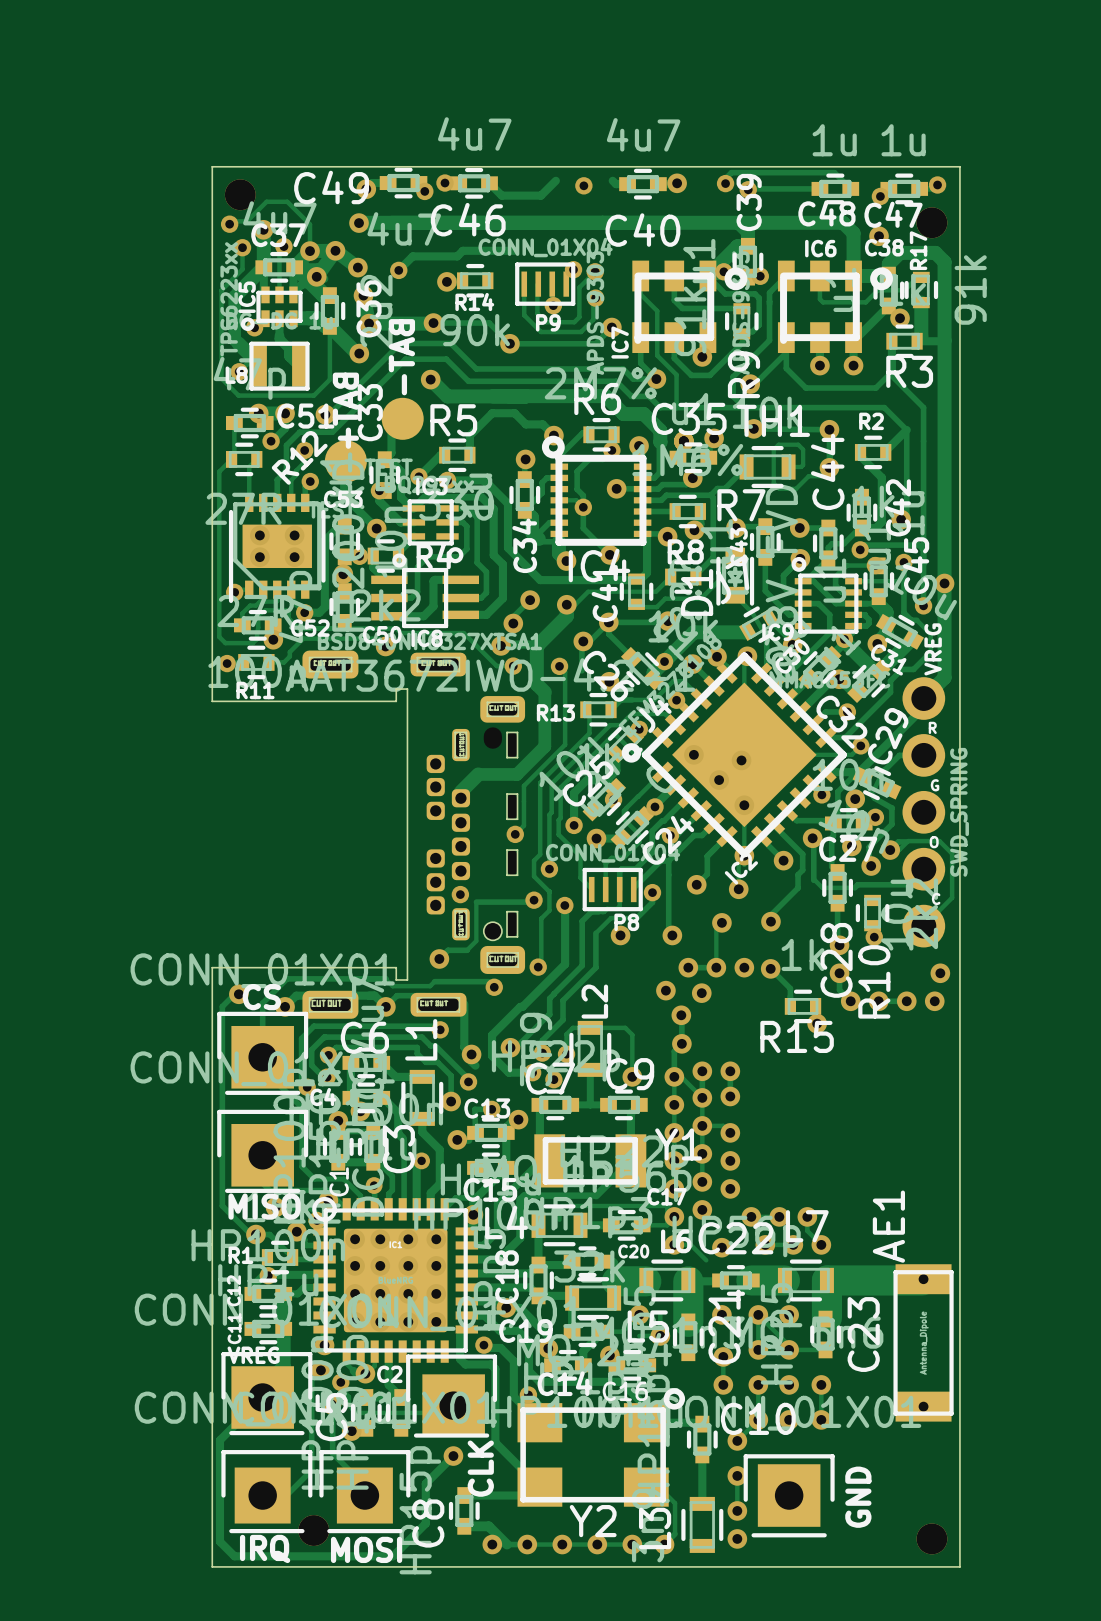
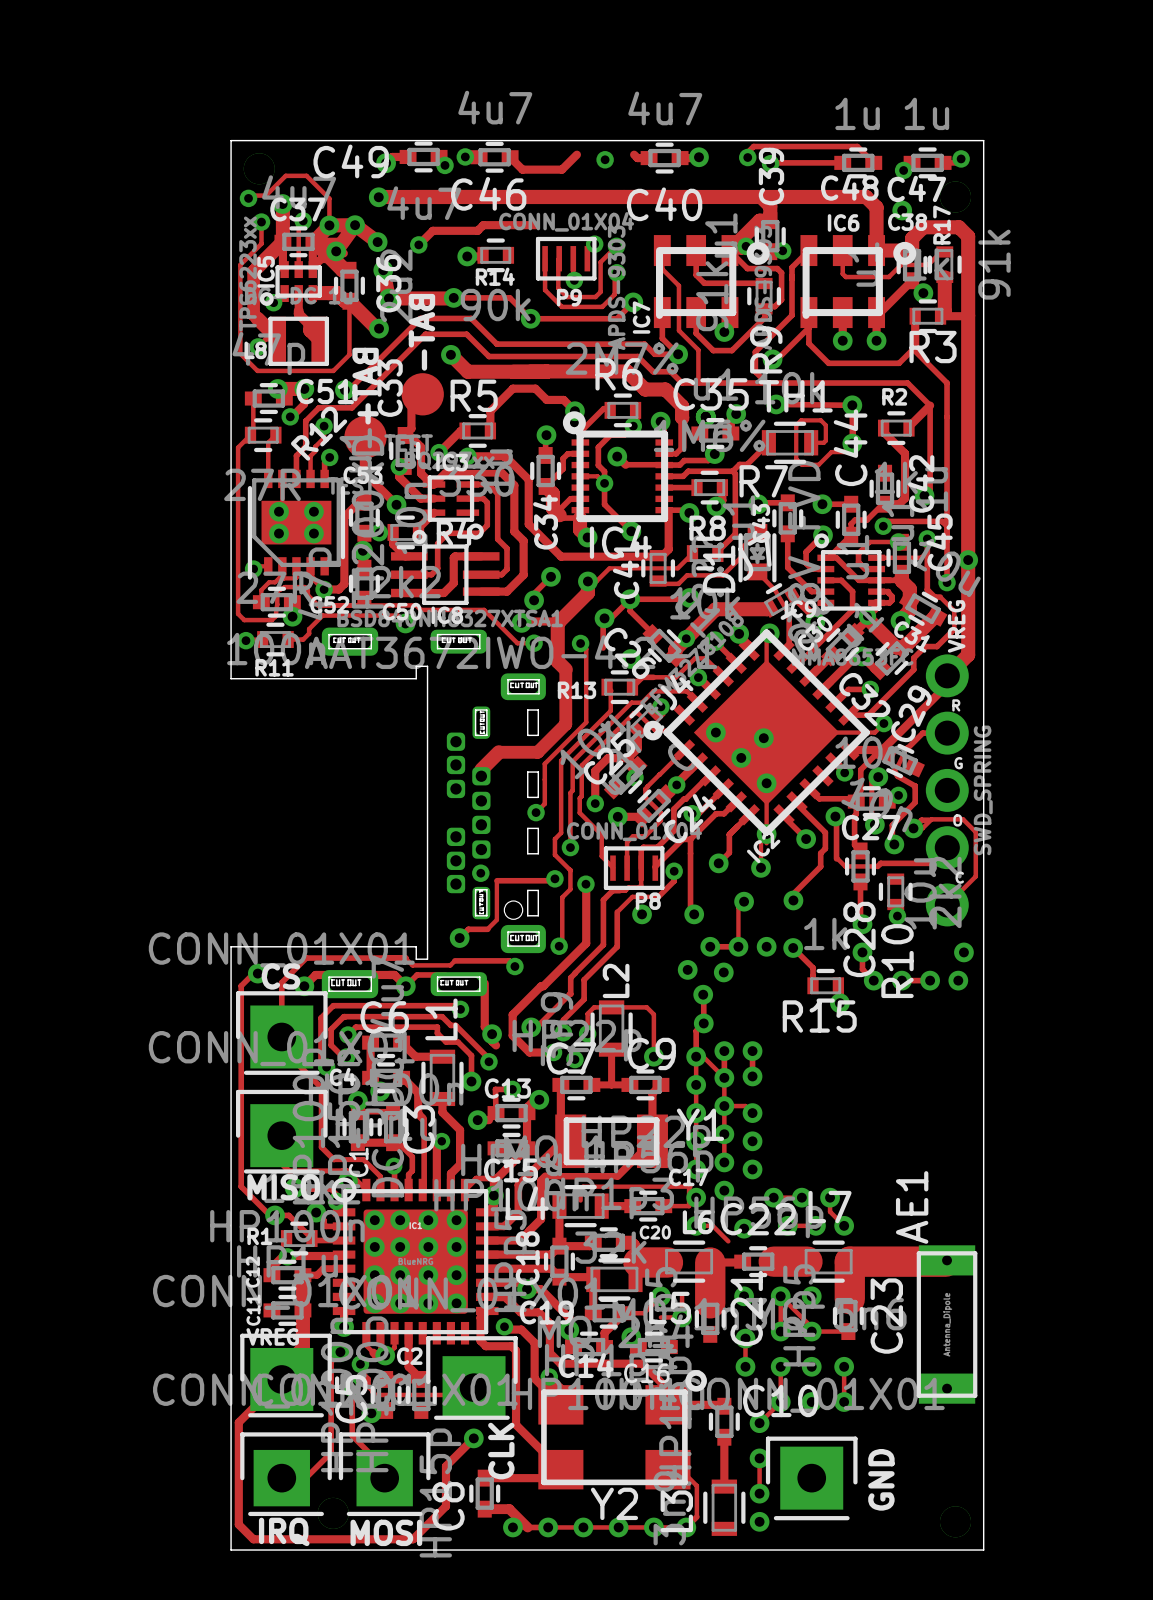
track: none -> (617, 456) (625, 464) (636, 464)
via position: (616, 488) -> (617, 456)

